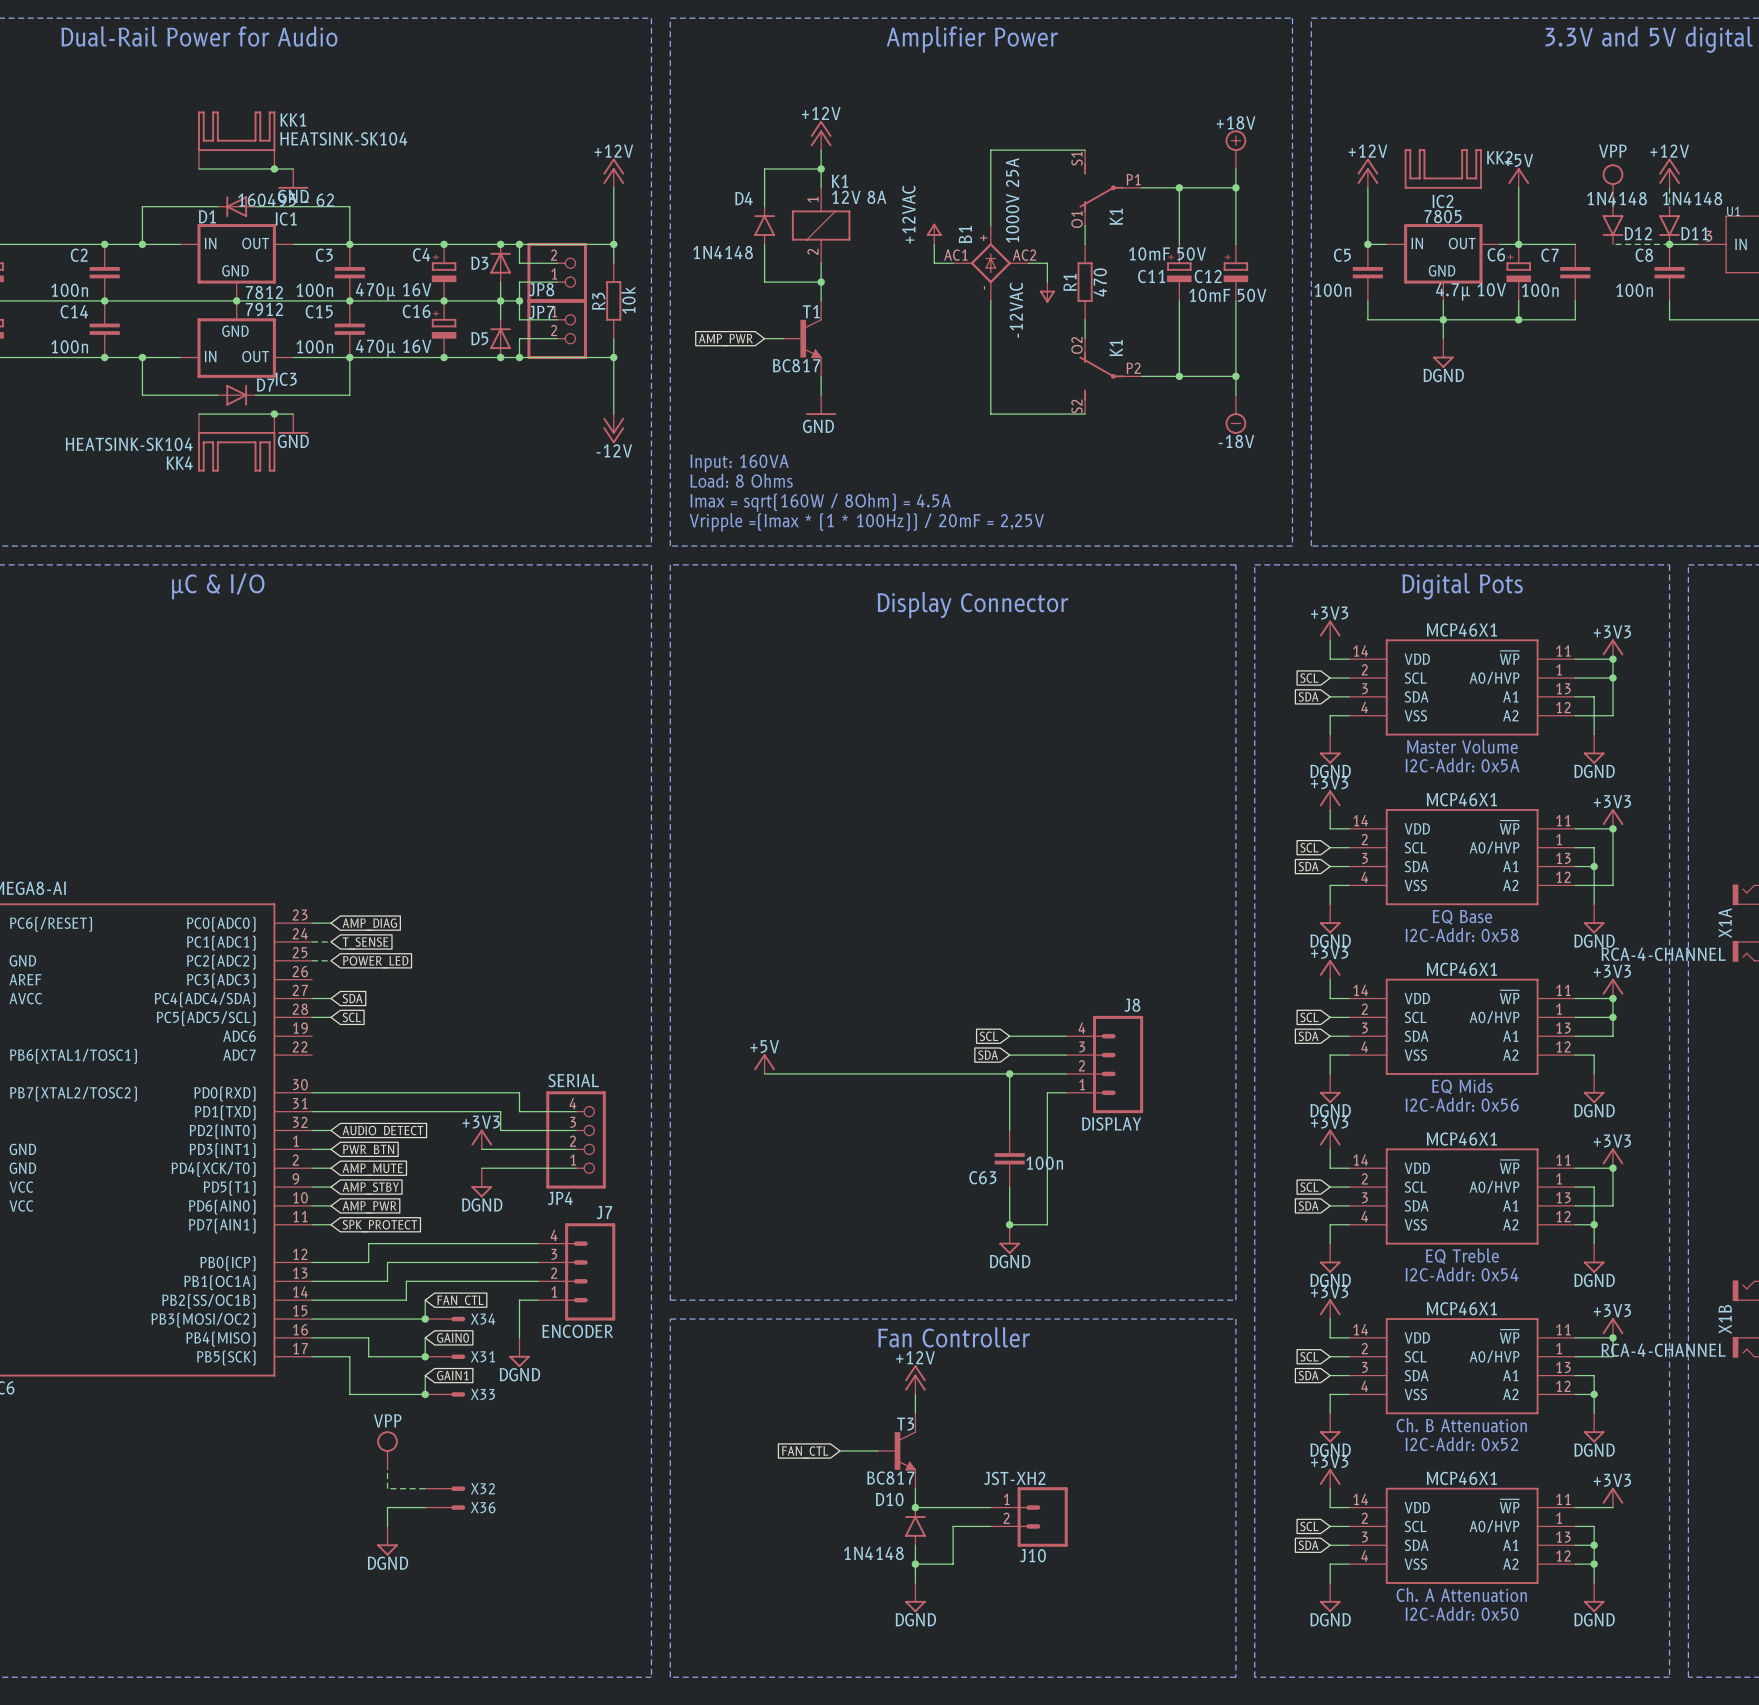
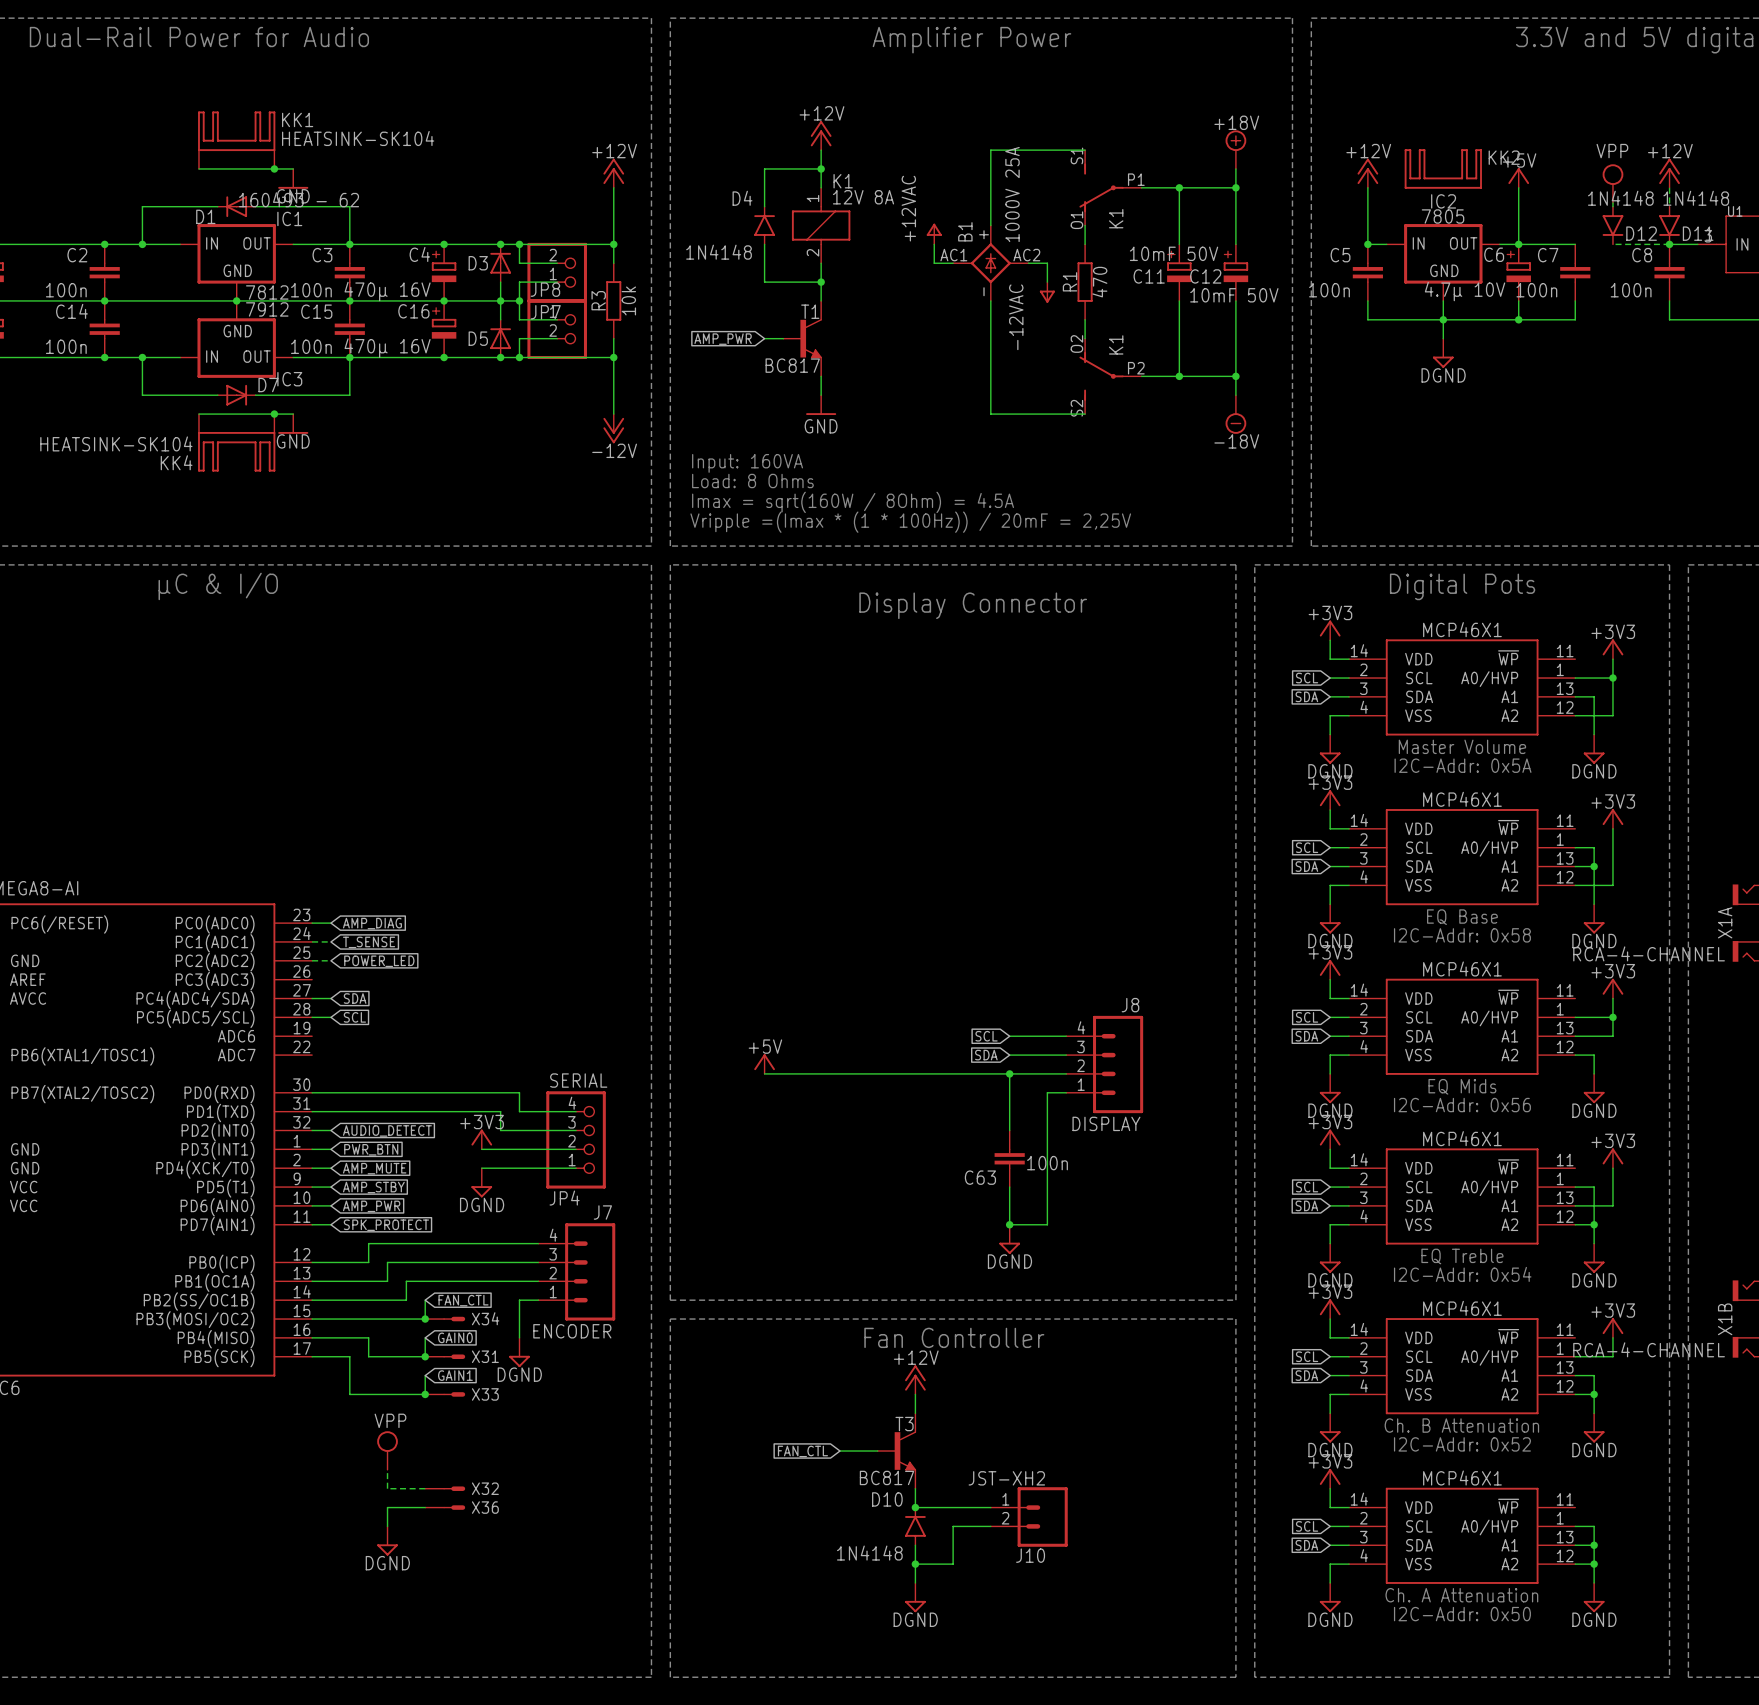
wire: (1575, 659) (1612, 659) -> none
junction: (1612, 659) -> none
wire: (1575, 828) (1612, 828) -> none
junction: (1612, 828) -> none
wire: (1575, 998) (1612, 998) -> none
junction: (1612, 998) -> none
wire: (1575, 1168) (1612, 1168) -> none
junction: (1612, 1168) -> none
wire: (1575, 1337) (1612, 1337) -> none
junction: (1612, 1337) -> none
power symbol: +3V3 (1612, 1497) -> none
wire: (1575, 1507) (1612, 1507) -> none

